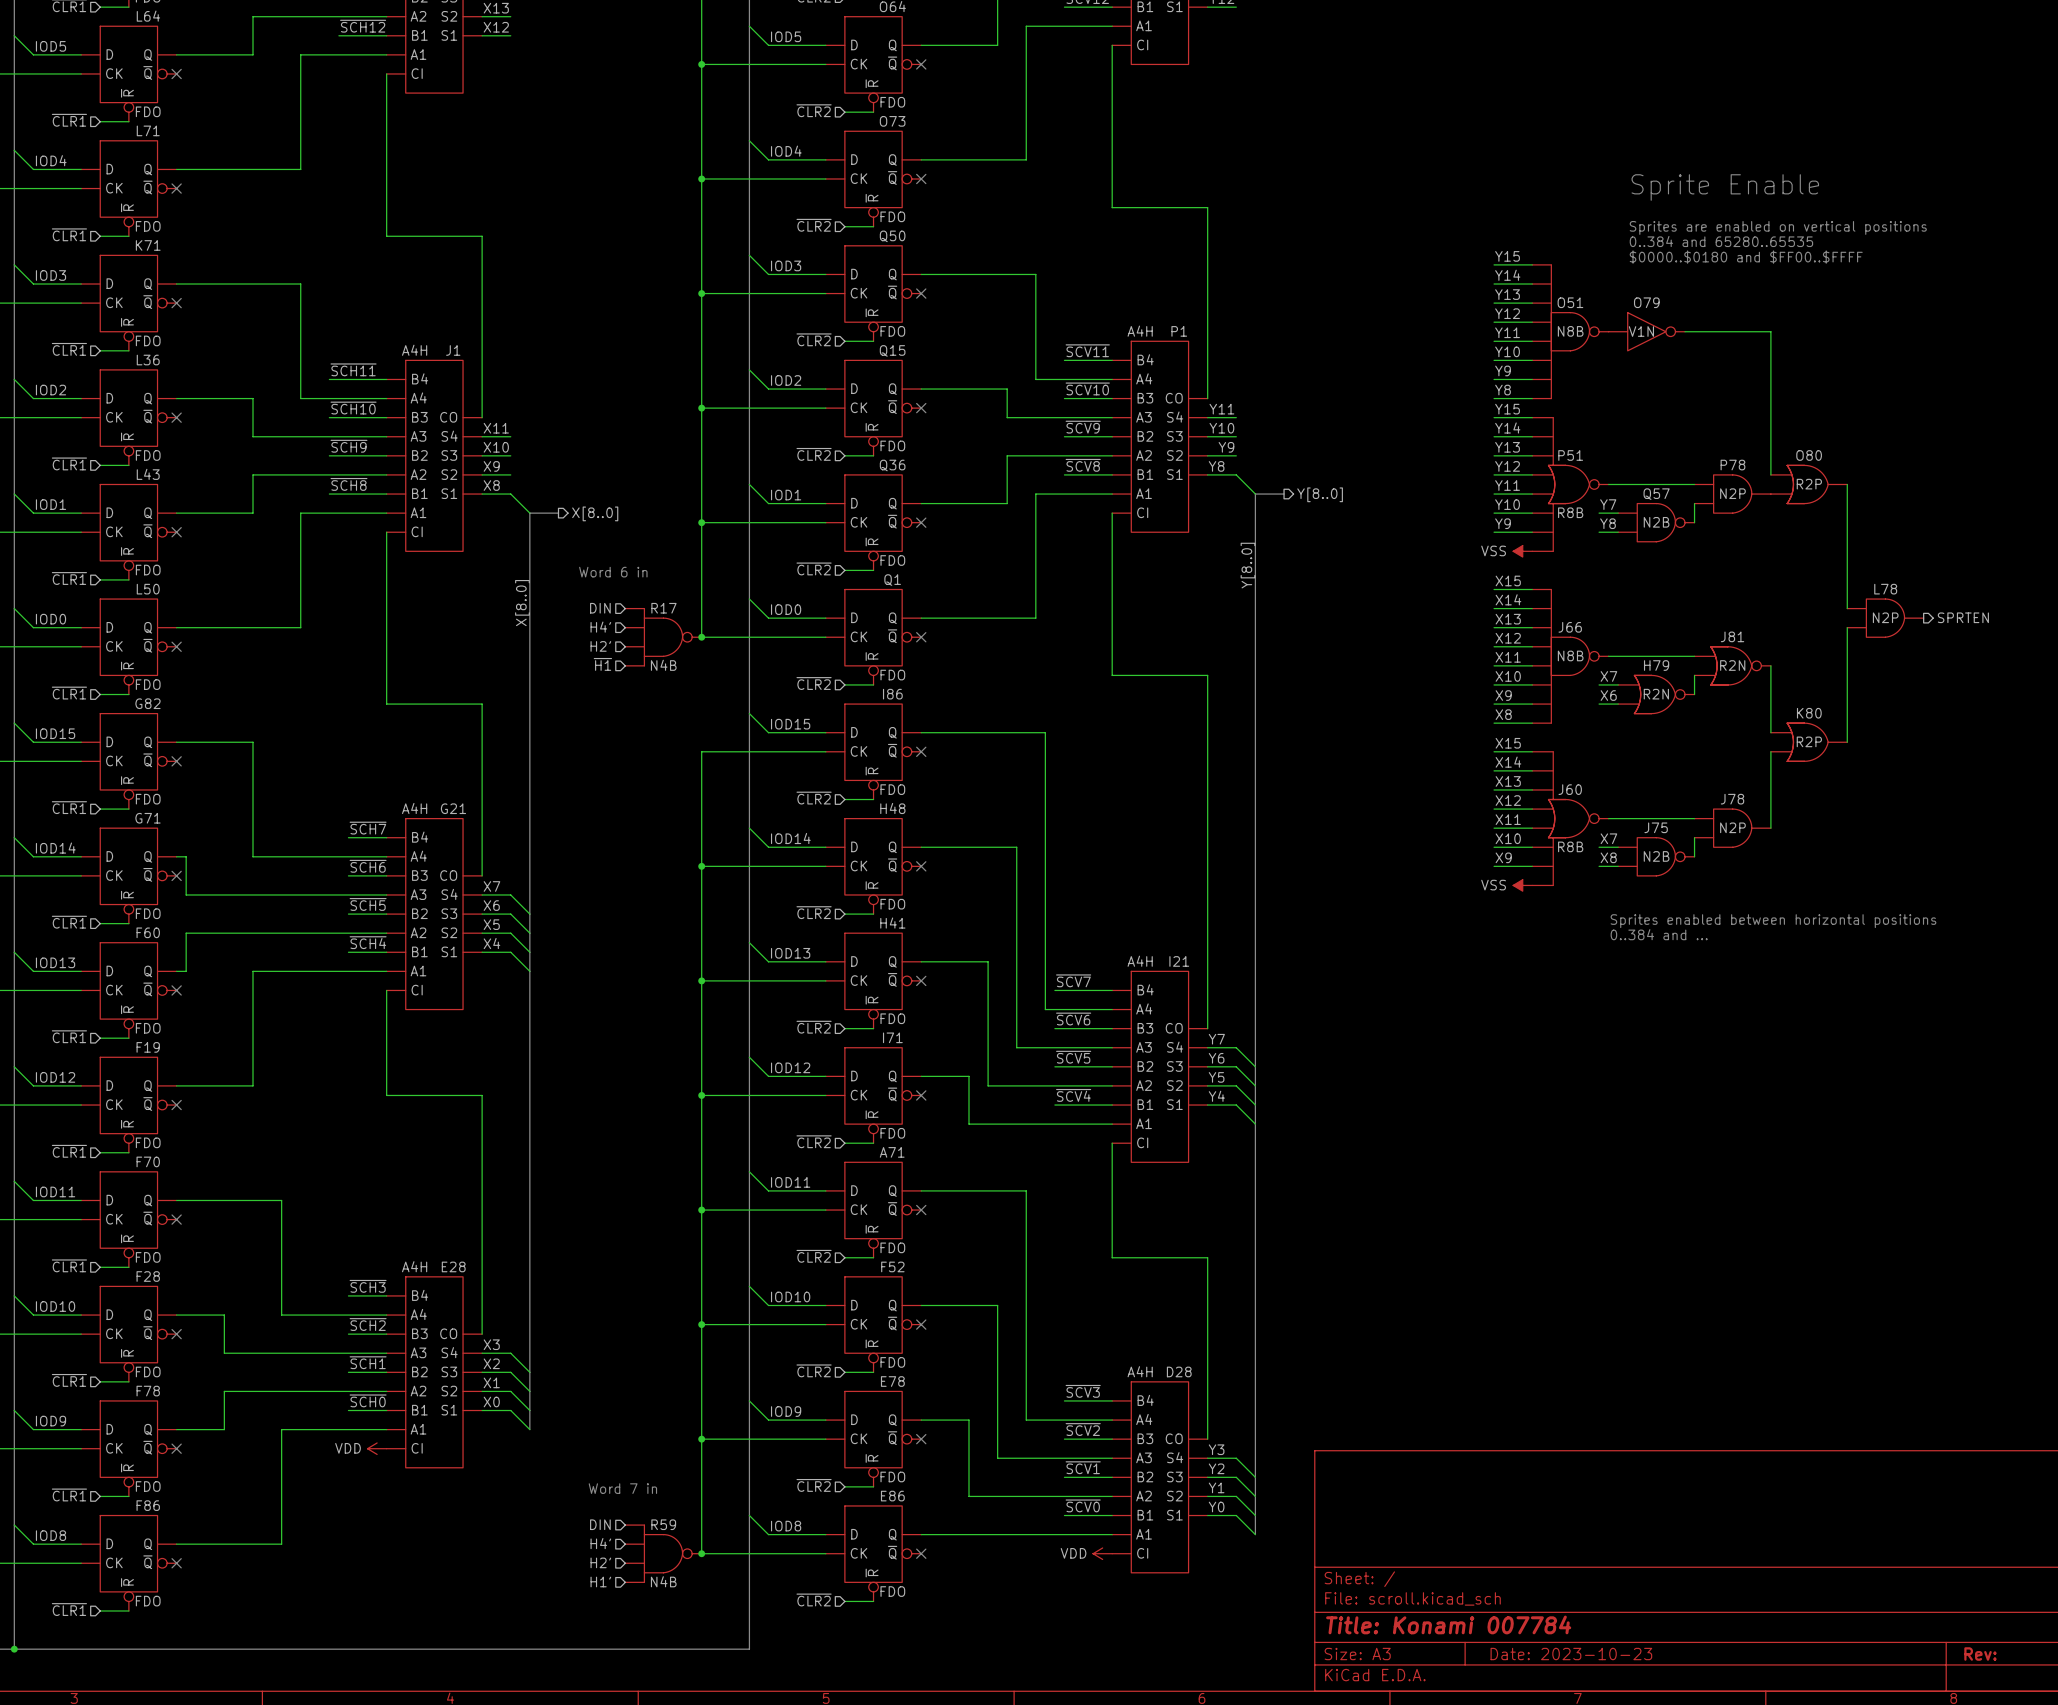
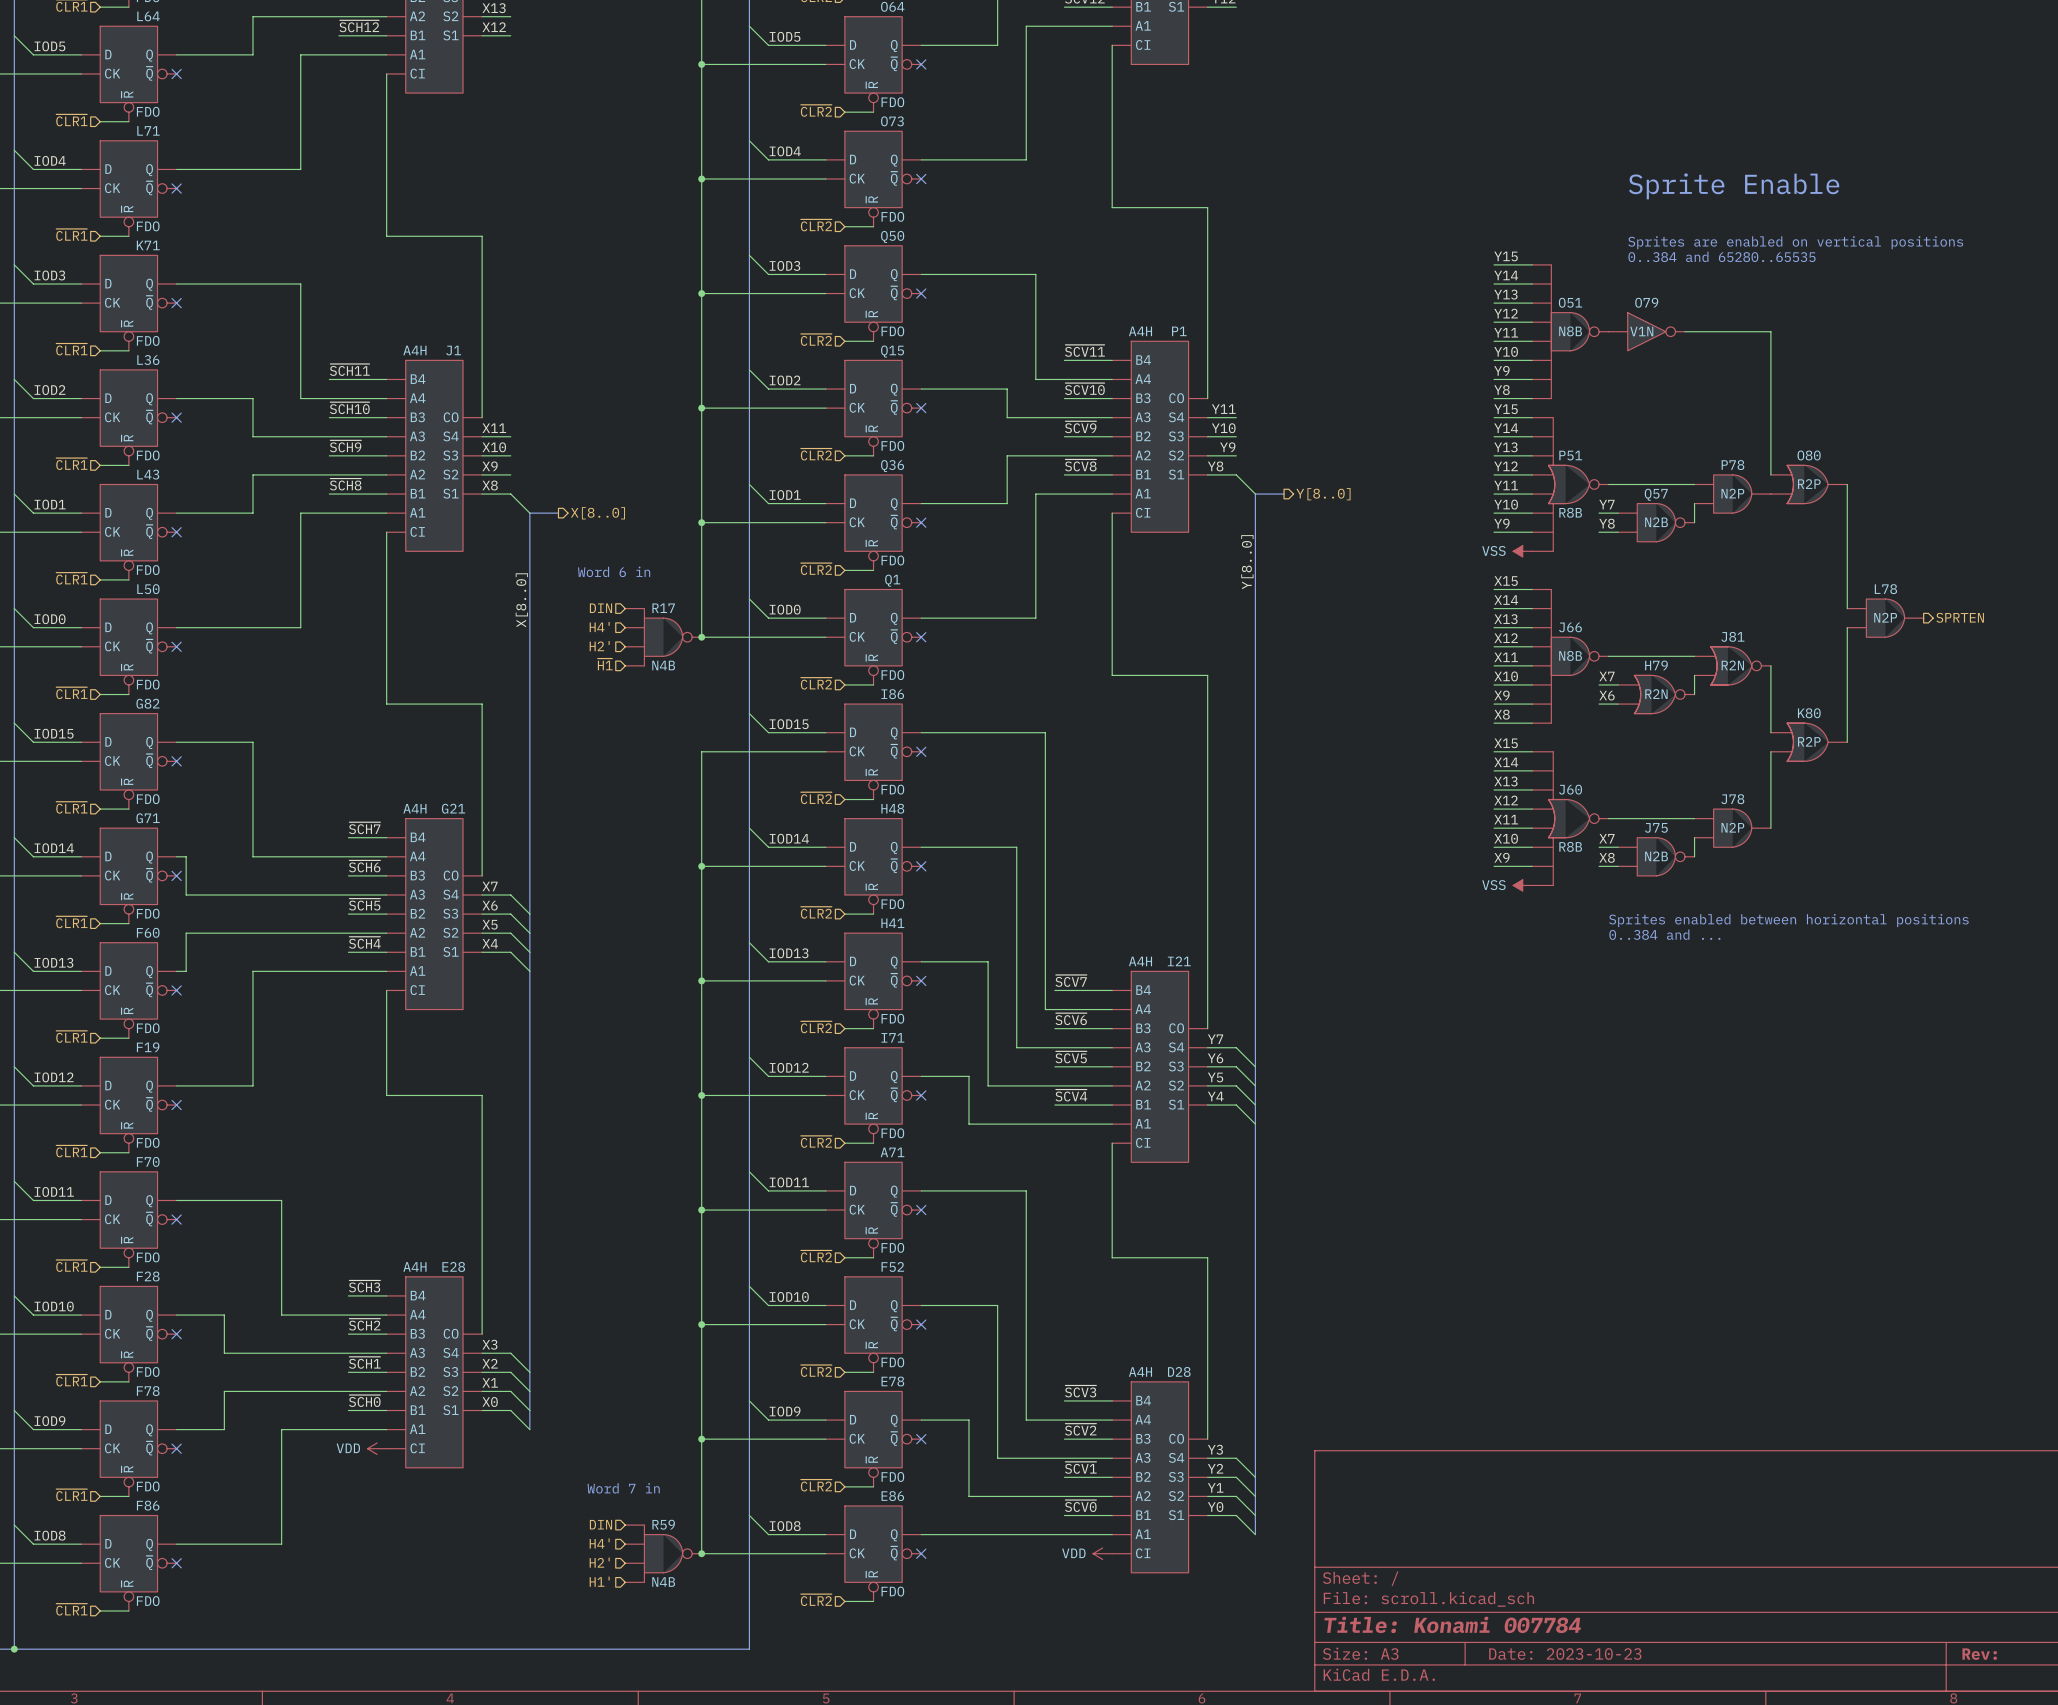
text: Sprites are enabled on vertical positions (1778, 227) -> none
text: 0..384 and 65280..65535 (1721, 241) -> Sprites are enabled on vertical positions (1795, 242)
text: $0000..$0180 and $FF00..$FFFF (1746, 257) -> 0..384 and 65280..65535 (1722, 256)

